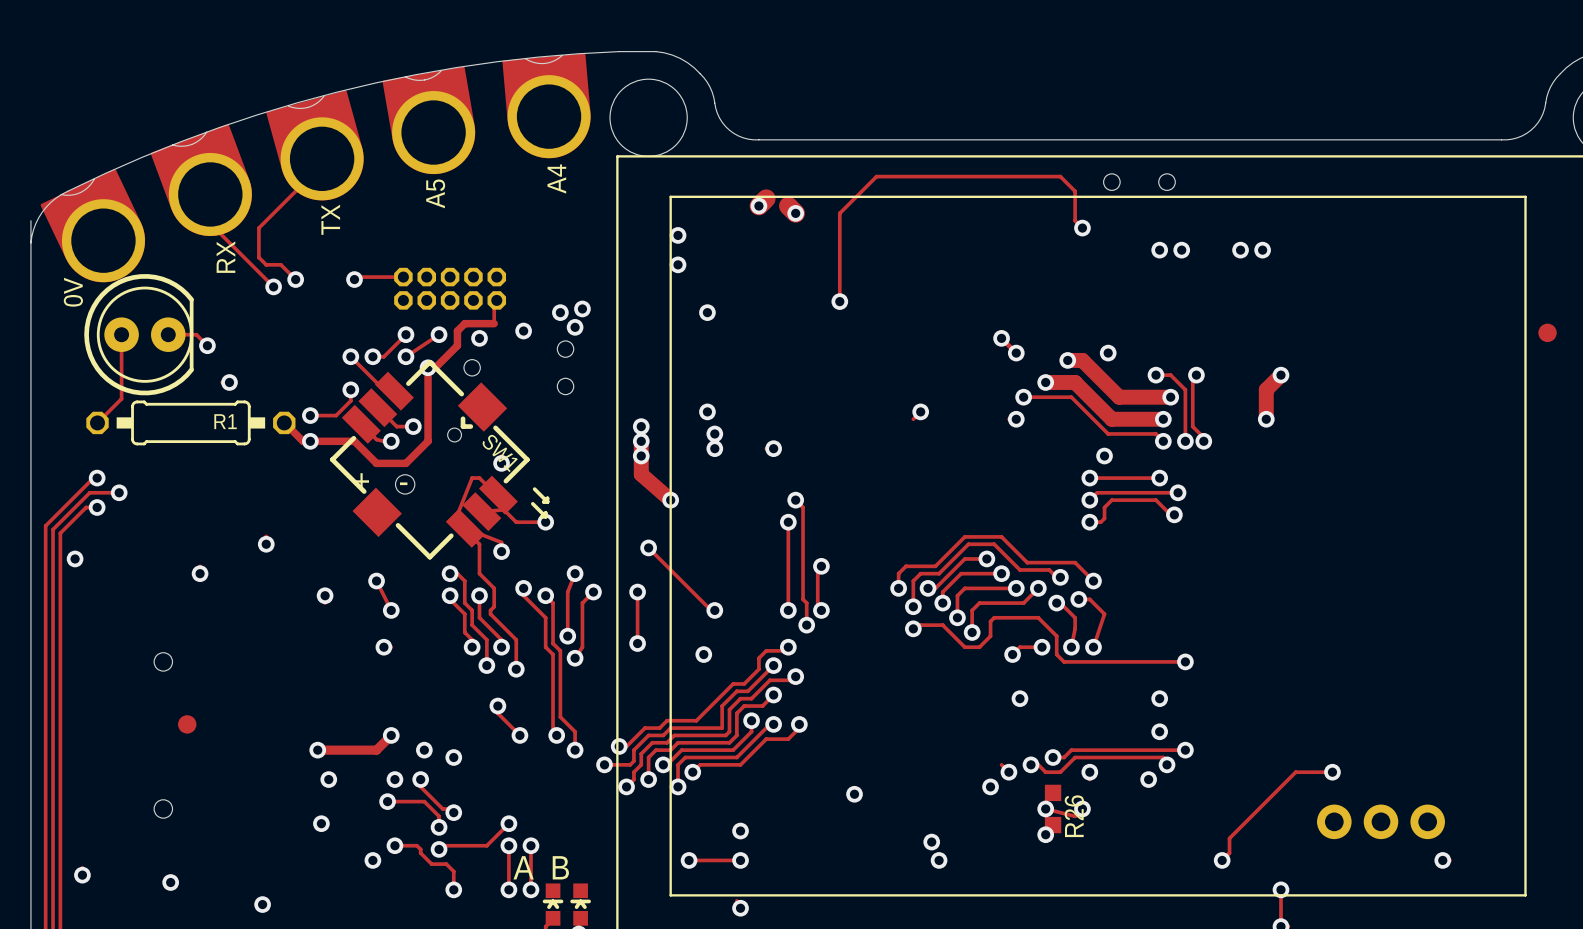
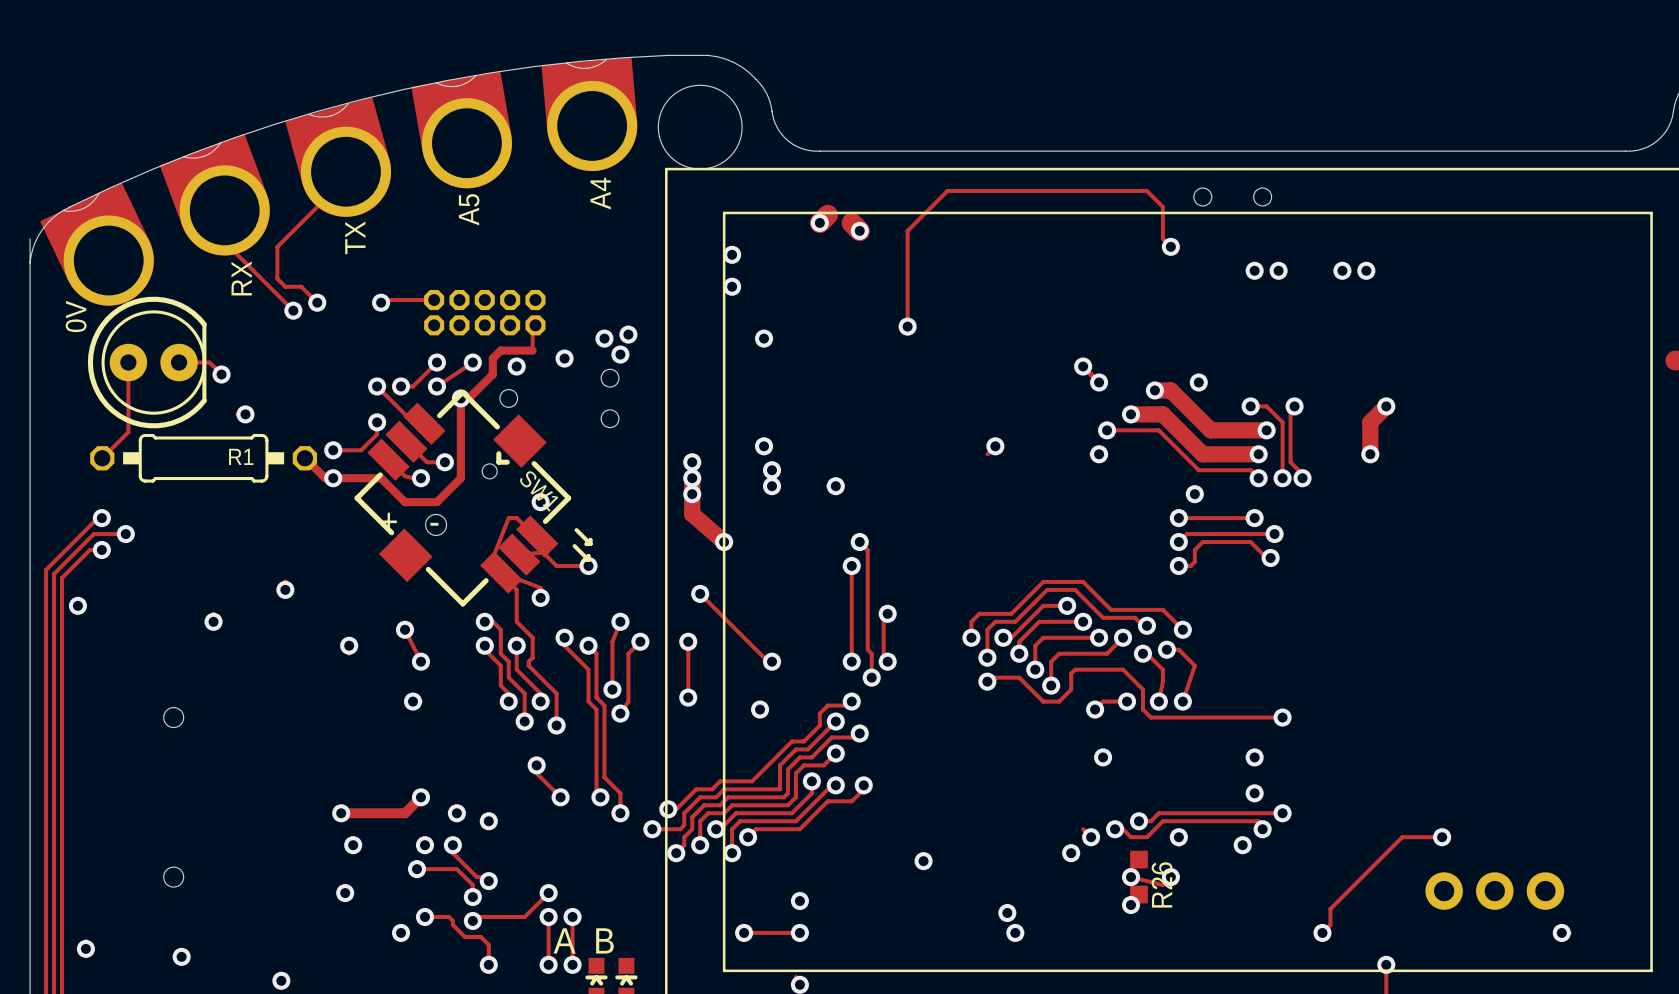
part: (187, 724) -> none

